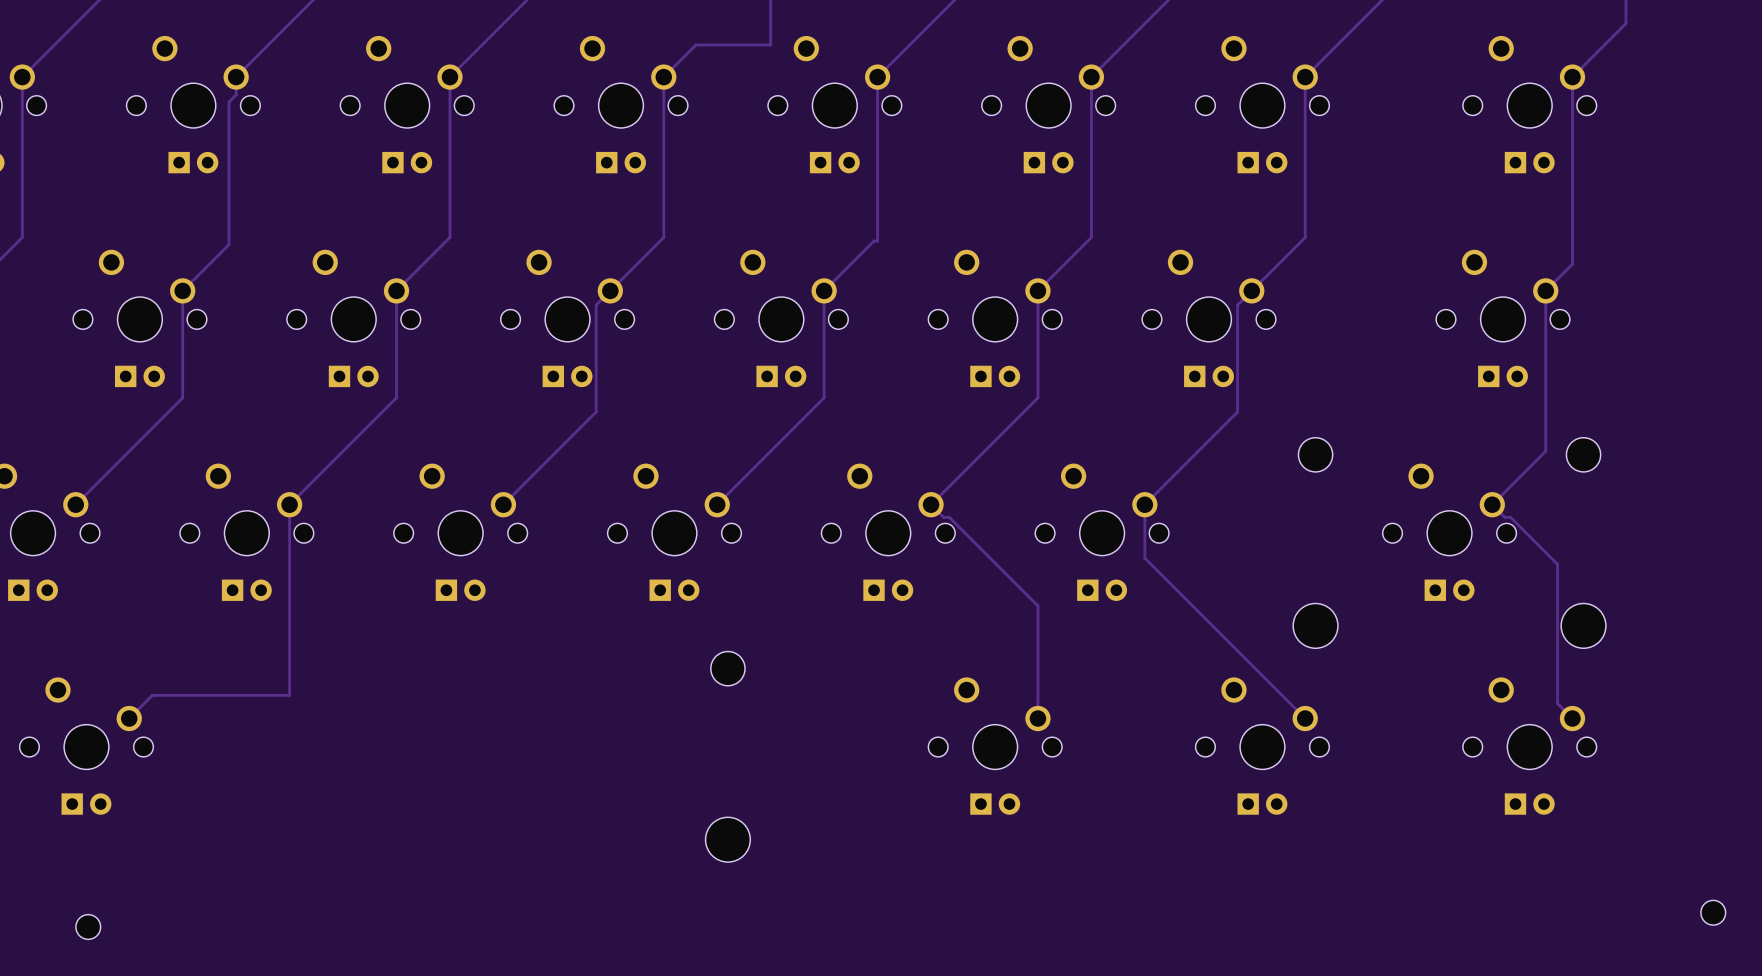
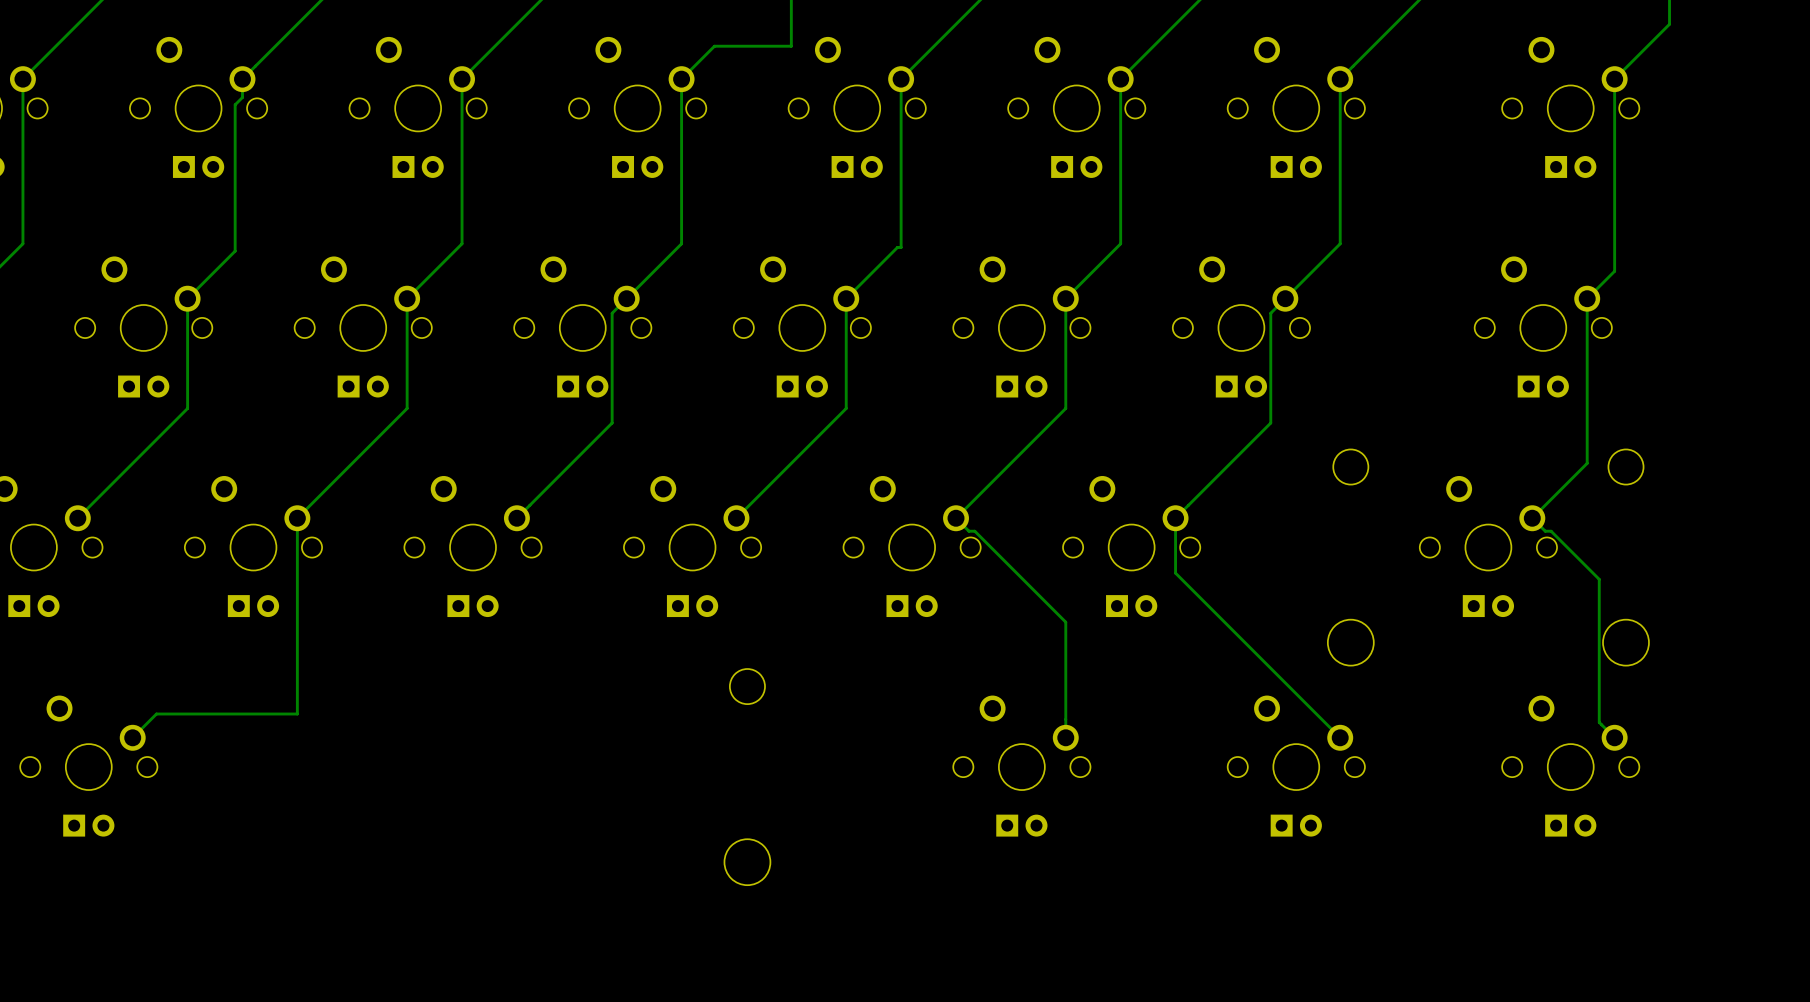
part: (1713, 912) -> none
part: (88, 927) -> none

